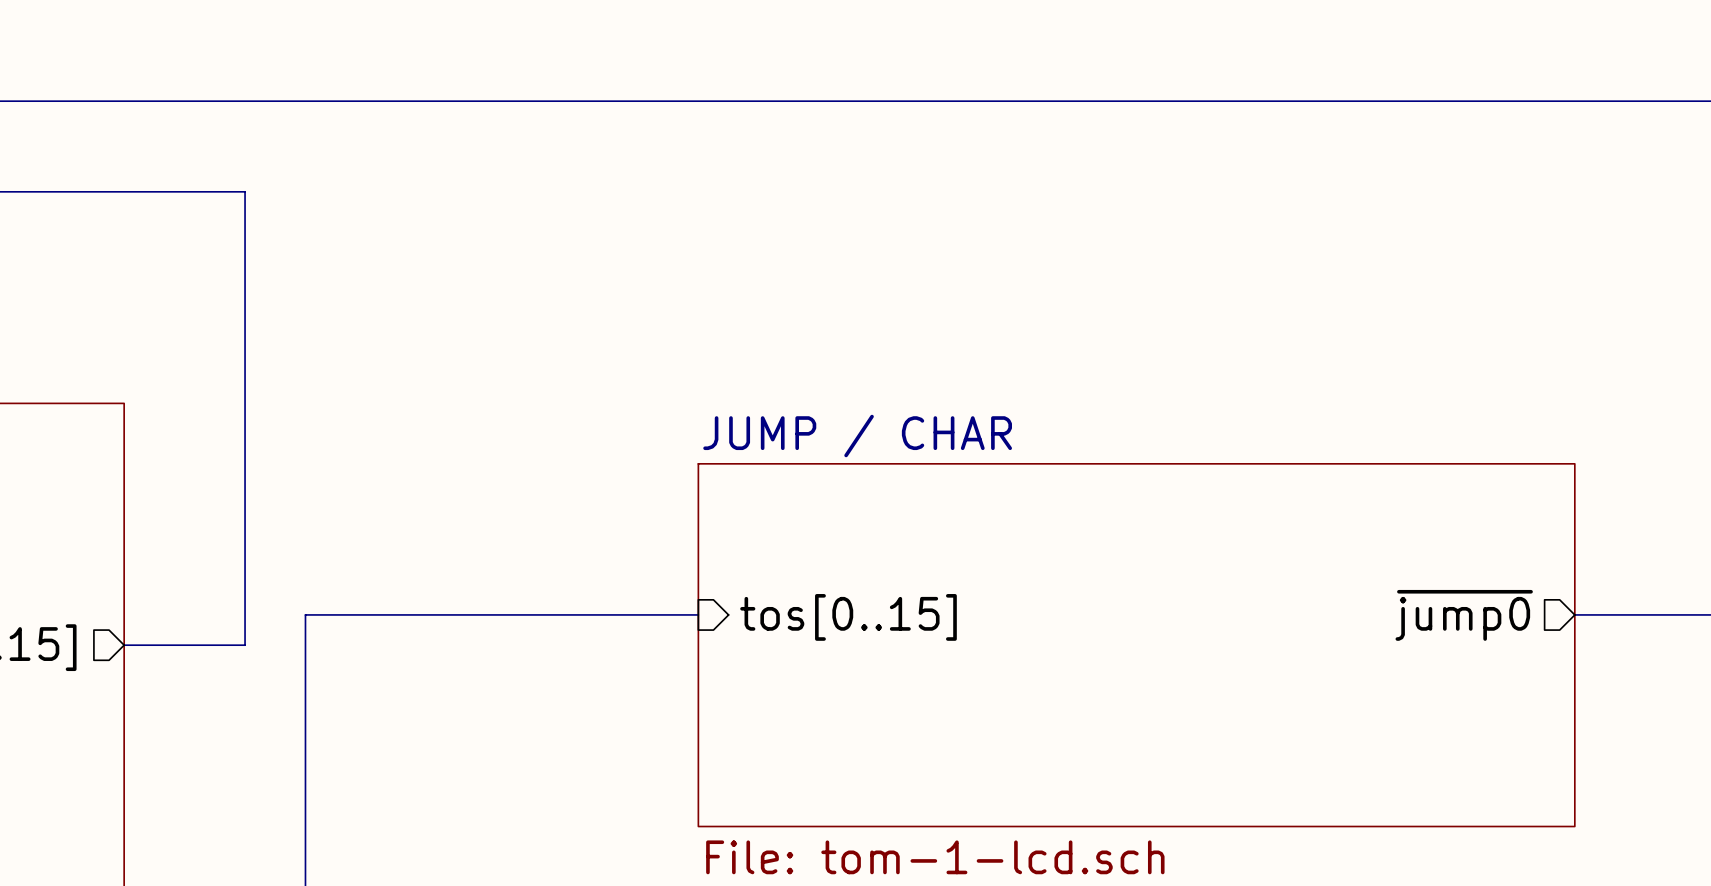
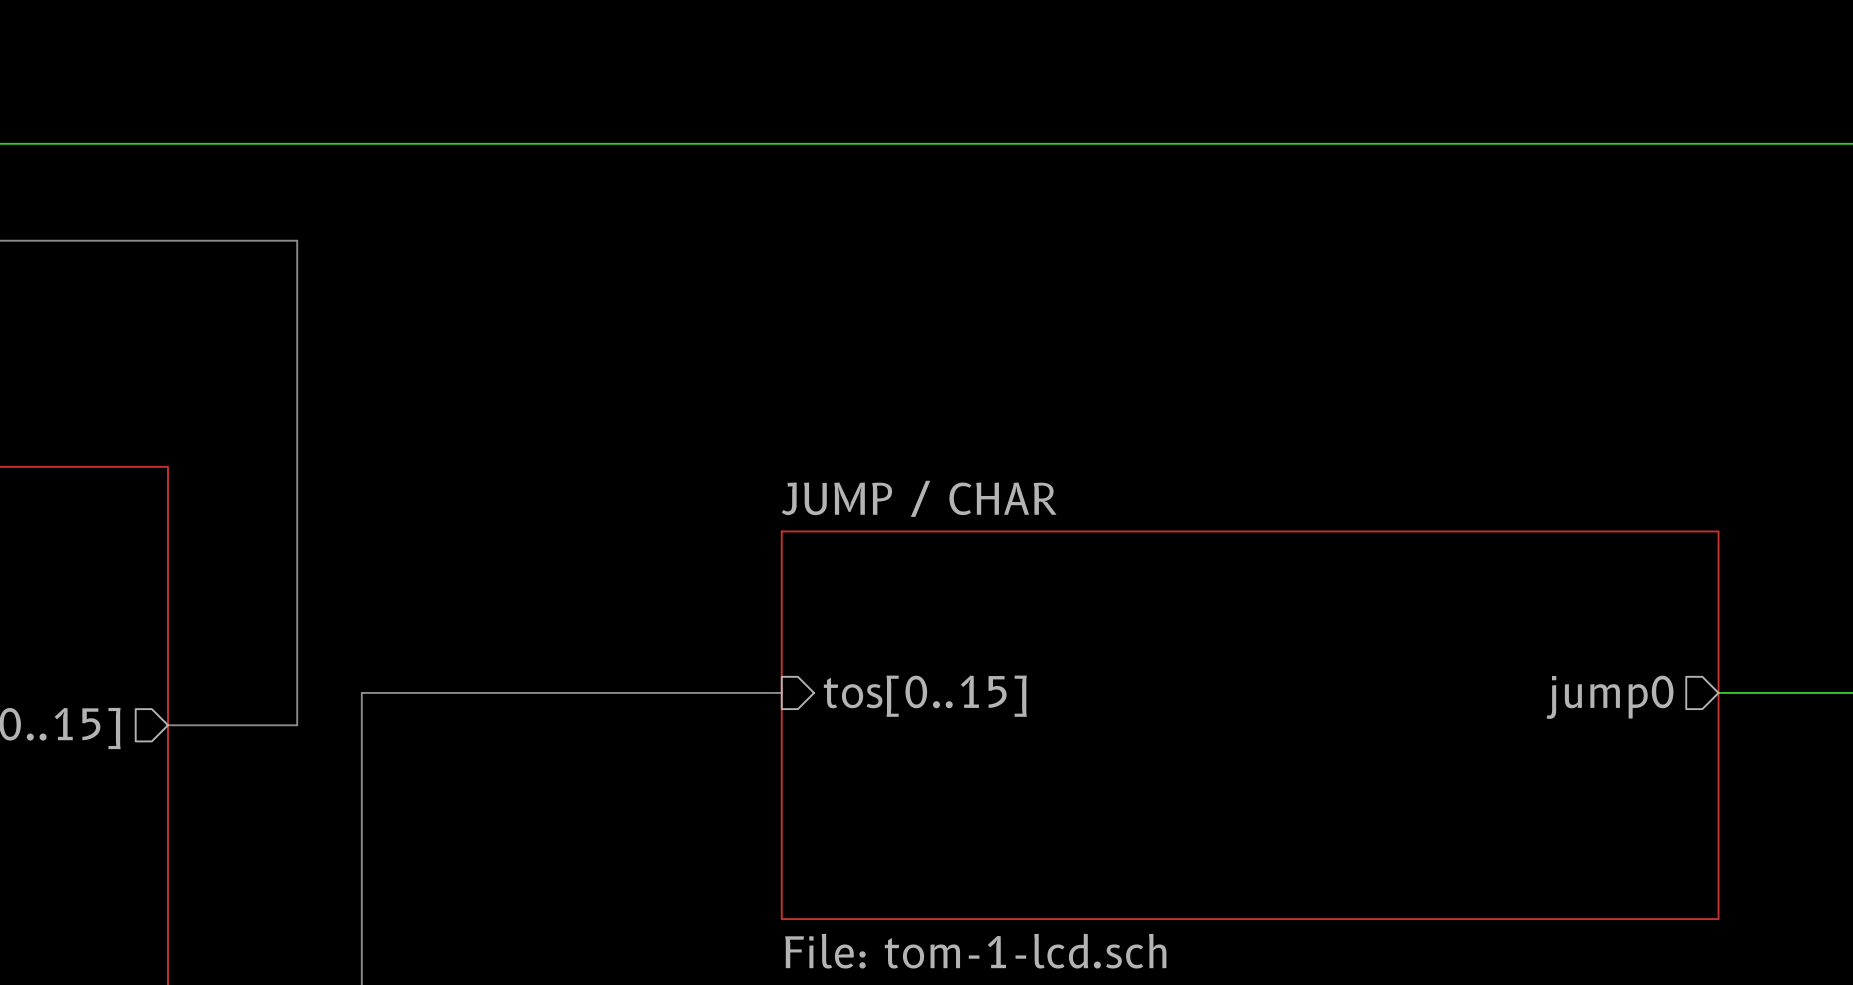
sheet pin: ~{jump0} (1464, 615) -> jump0 (1610, 697)

